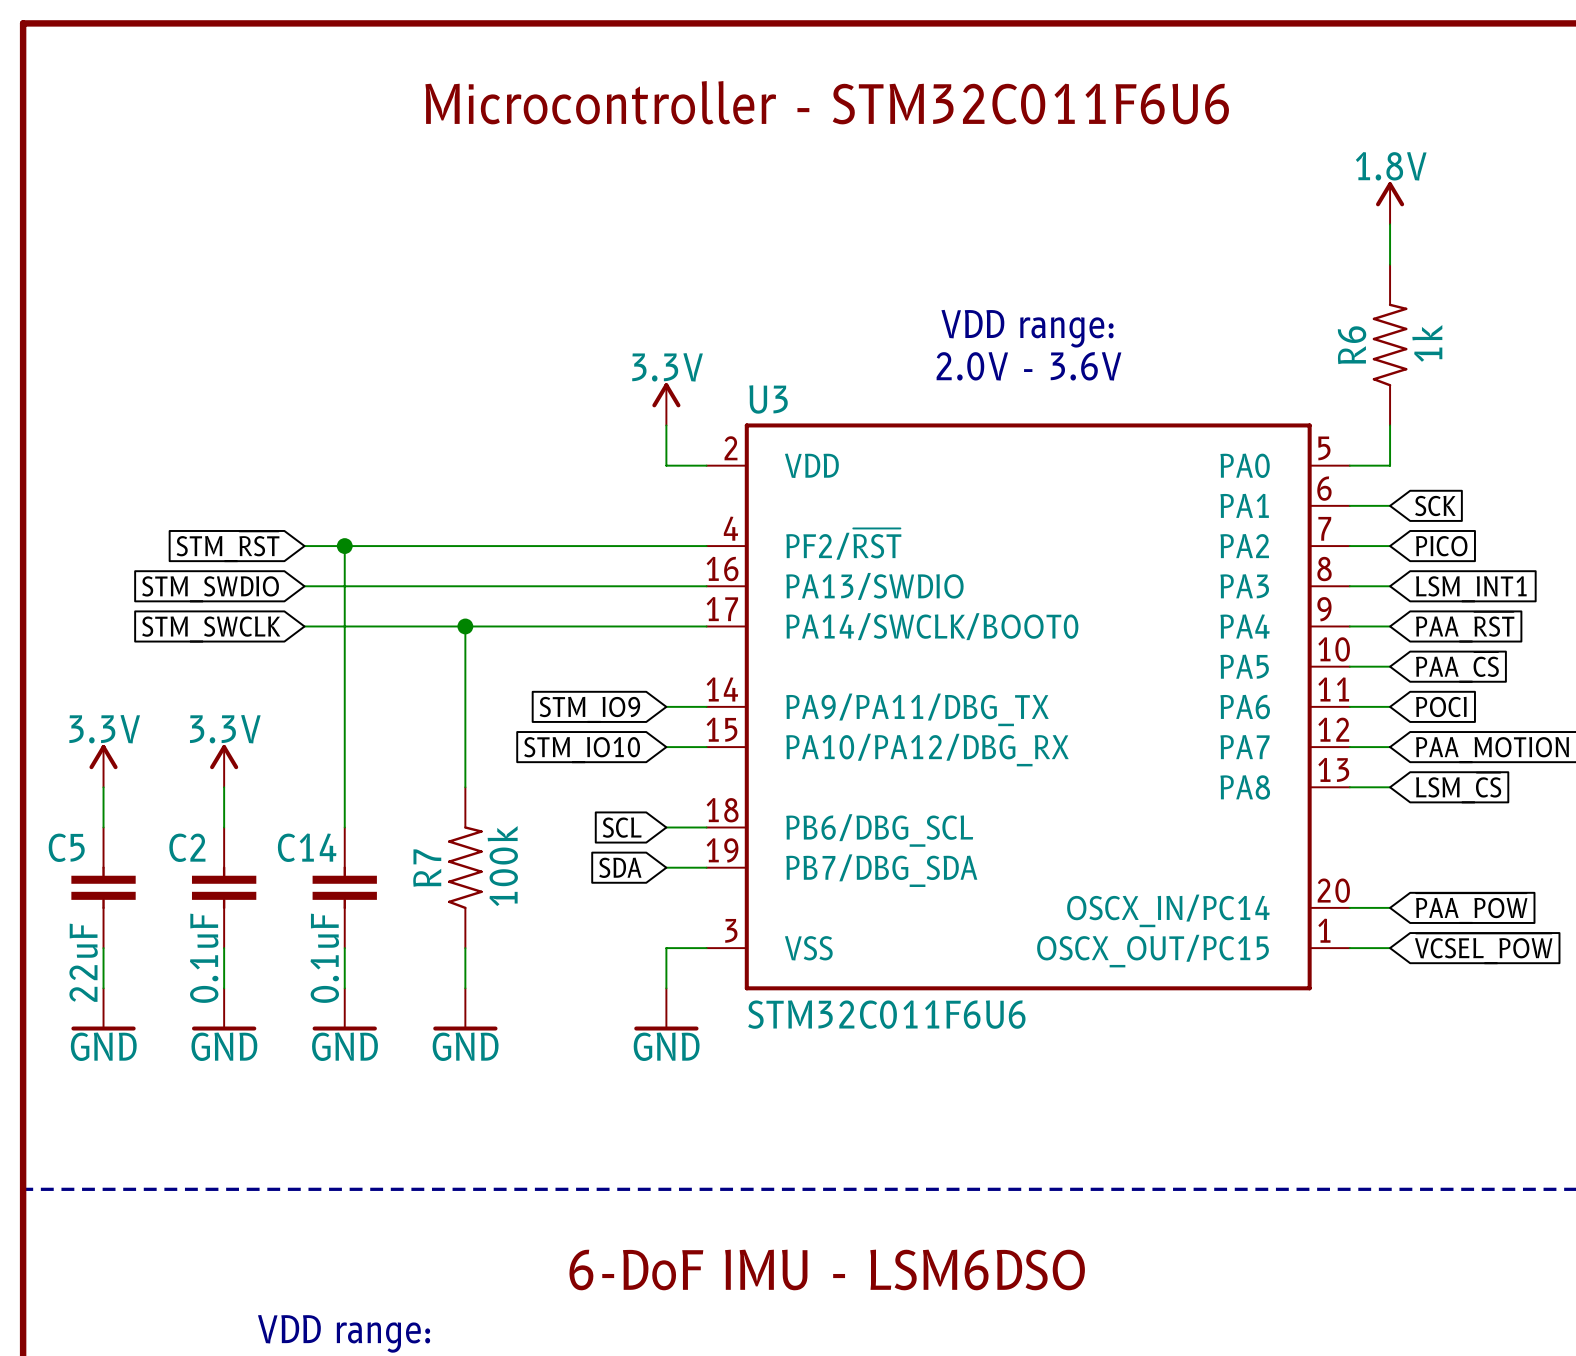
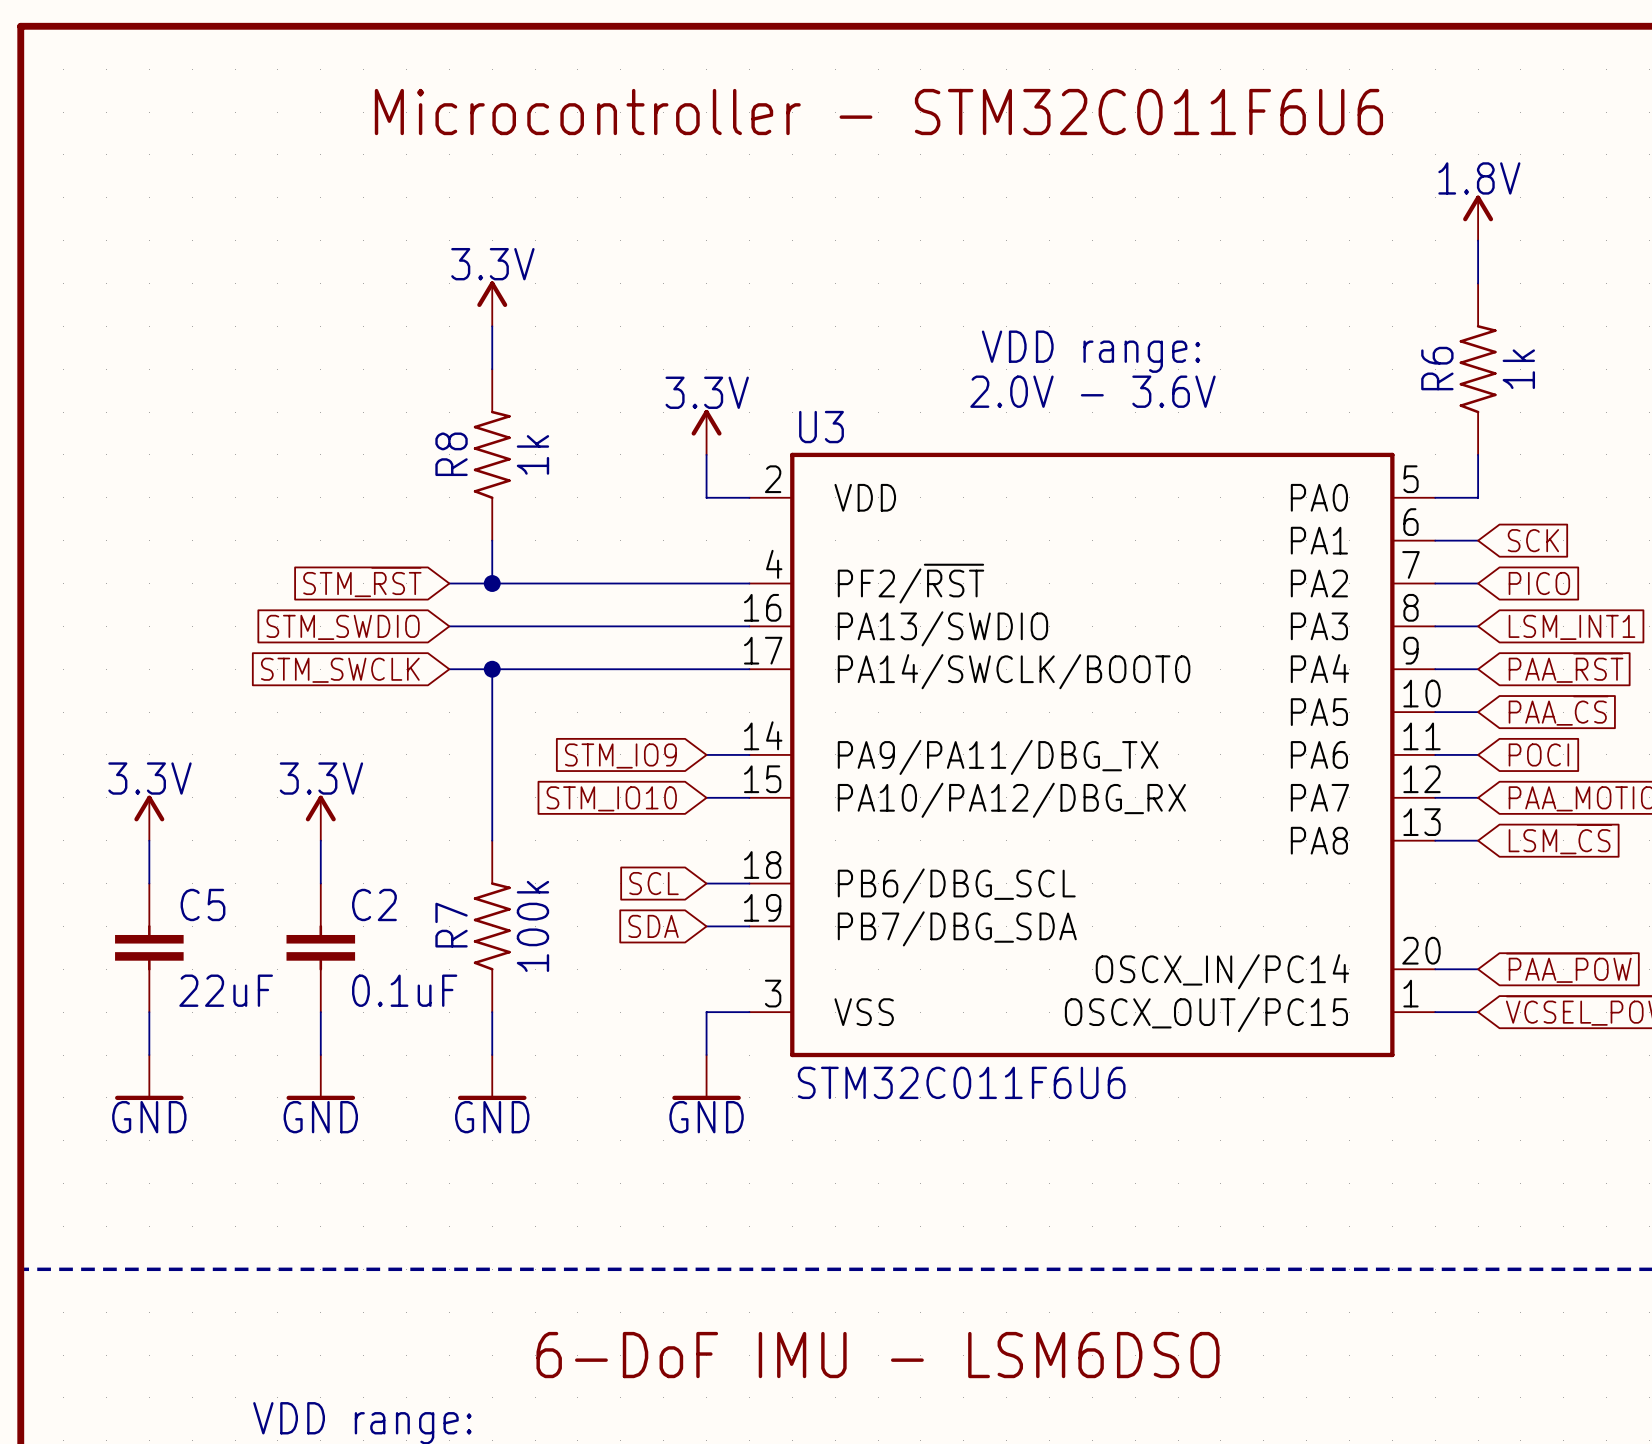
power symbol: none -> 3.3V (492, 303)
wire: none -> (492, 326) (492, 369)
R8: none -> 1k (492, 454)
wire: none -> (492, 540) (492, 583)
global label position: STM_~{RST} (228, 546) -> STM_~{RST} (362, 582)
wire: (304, 546) (425, 546) -> none
wire: (344, 546) (344, 827) -> none
junction: (344, 546) -> none
junction: none -> (492, 583)
wire: (304, 586) (425, 586) -> none
global label position: STM_SWDIO (210, 589) -> STM_SWDIO (343, 627)
wire: (304, 626) (425, 626) -> none
global label position: STM_SWCLK (211, 629) -> STM_SWCLK (340, 670)
power symbol: 3.3V (103, 766) -> none
power symbol: none -> 3.3V (149, 818)
power symbol: 3.3V (224, 766) -> none
power symbol: none -> 3.3V (320, 818)
wire: (103, 787) (103, 827) -> (149, 840) (149, 883)
wire: (224, 787) (224, 827) -> (320, 840) (320, 883)
C5 name position: C5 (66, 847) -> C5 (203, 904)
C2 name position: C2 (187, 847) -> C2 (374, 904)
C5 position: (103, 887) -> (149, 947)
C2 position: (224, 887) -> (320, 947)
C14: 0.1uF (344, 887) -> none
wire: (103, 948) (103, 988) -> (149, 1012) (149, 1055)
wire: (224, 948) (224, 988) -> (320, 1012) (320, 1055)
wire: (344, 948) (344, 988) -> none
C2 value rotation: 0° (204, 958) -> 90° clockwise (404, 990)
C5 value rotation: 0° (83, 962) -> 90° clockwise (226, 990)
power symbol: GND (103, 1009) -> none
power symbol: none -> GND (149, 1077)
power symbol: GND (224, 1009) -> none
power symbol: none -> GND (320, 1077)
power symbol: GND (344, 1009) -> none

